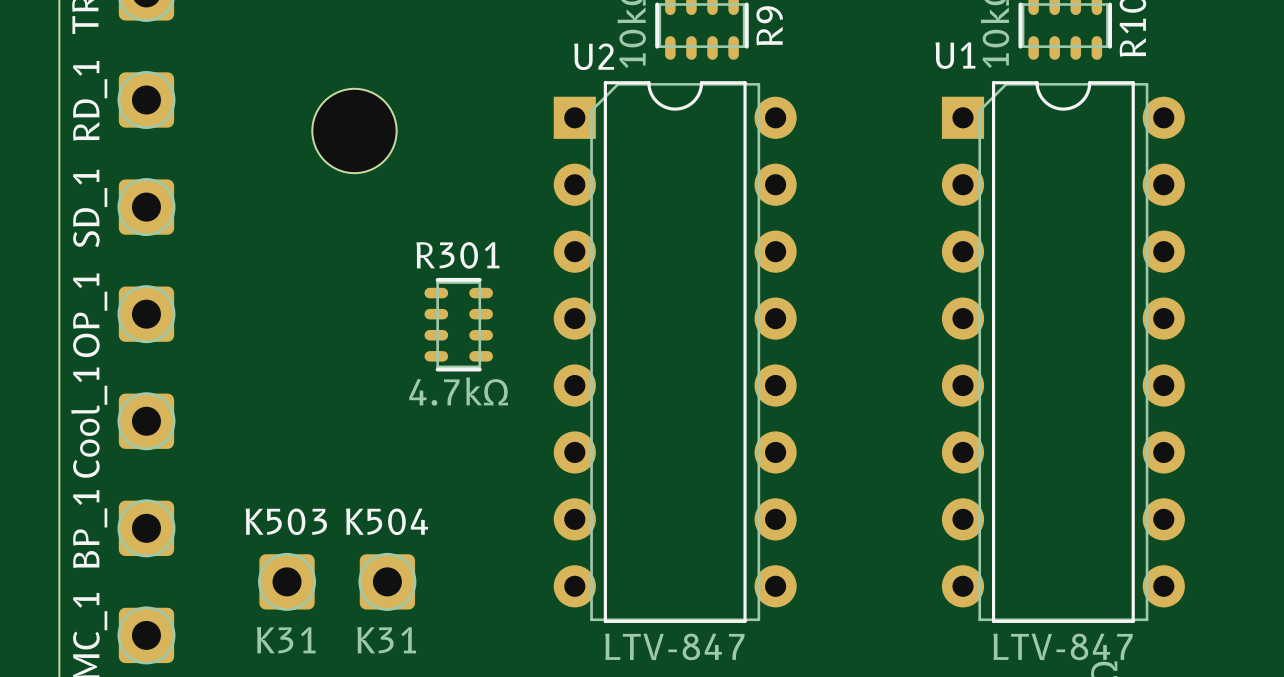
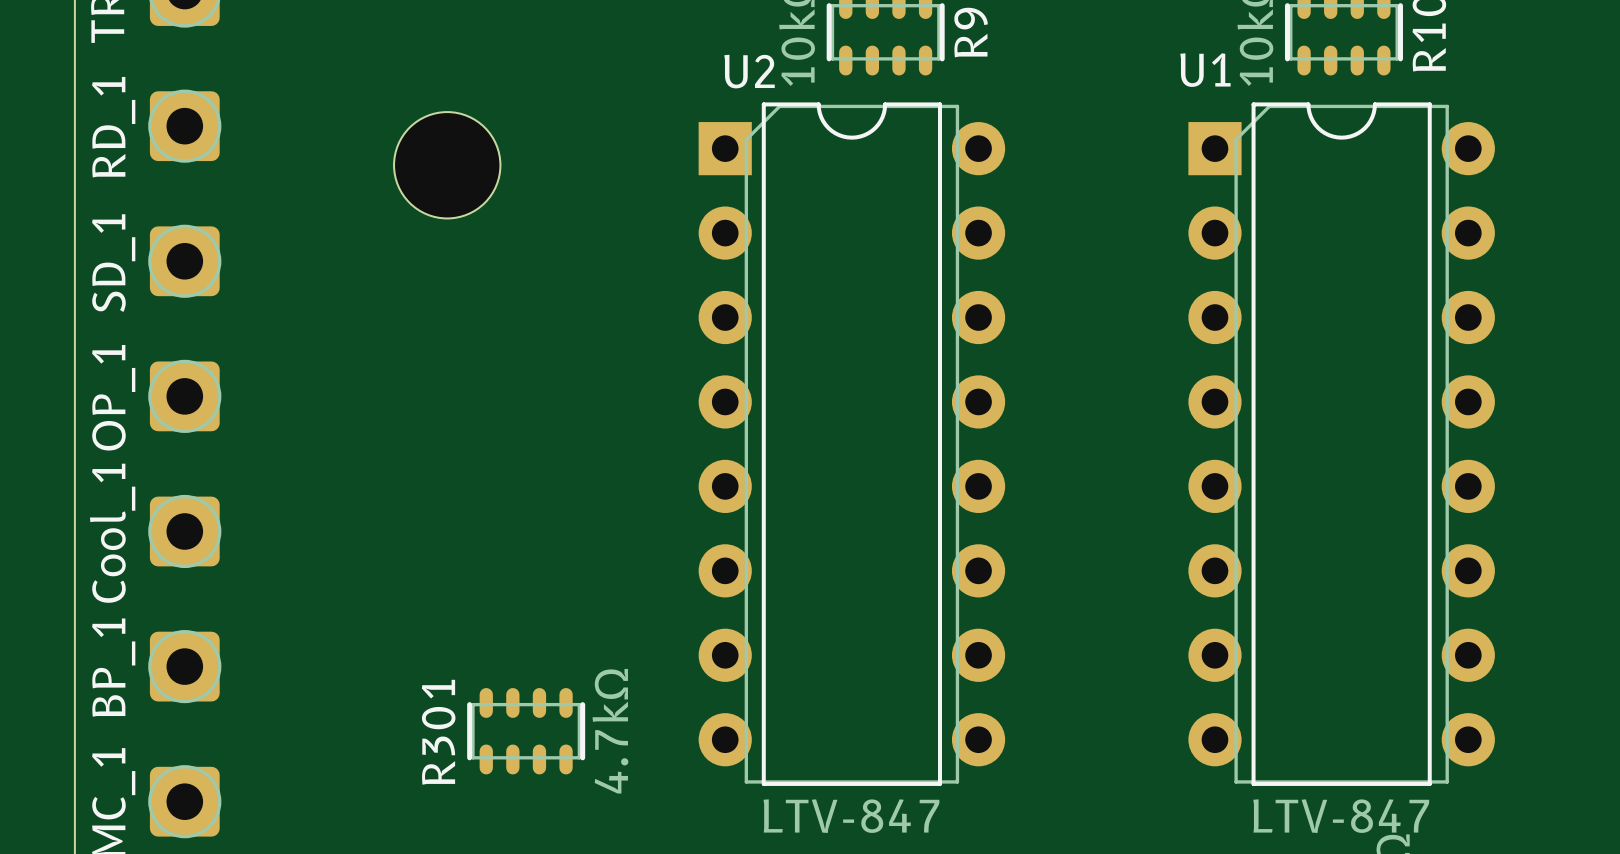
R301 name position: R301 (457, 255) -> R301 (438, 732)
R301 rotation: 0° (458, 324) -> 90° clockwise (526, 731)
R301 position: (458, 324) -> (526, 731)
R301 value position: 4.7kΩ (458, 391) -> 4.7kΩ (610, 731)
K503: K31 (287, 581) -> none
K504: K31 (387, 581) -> none

